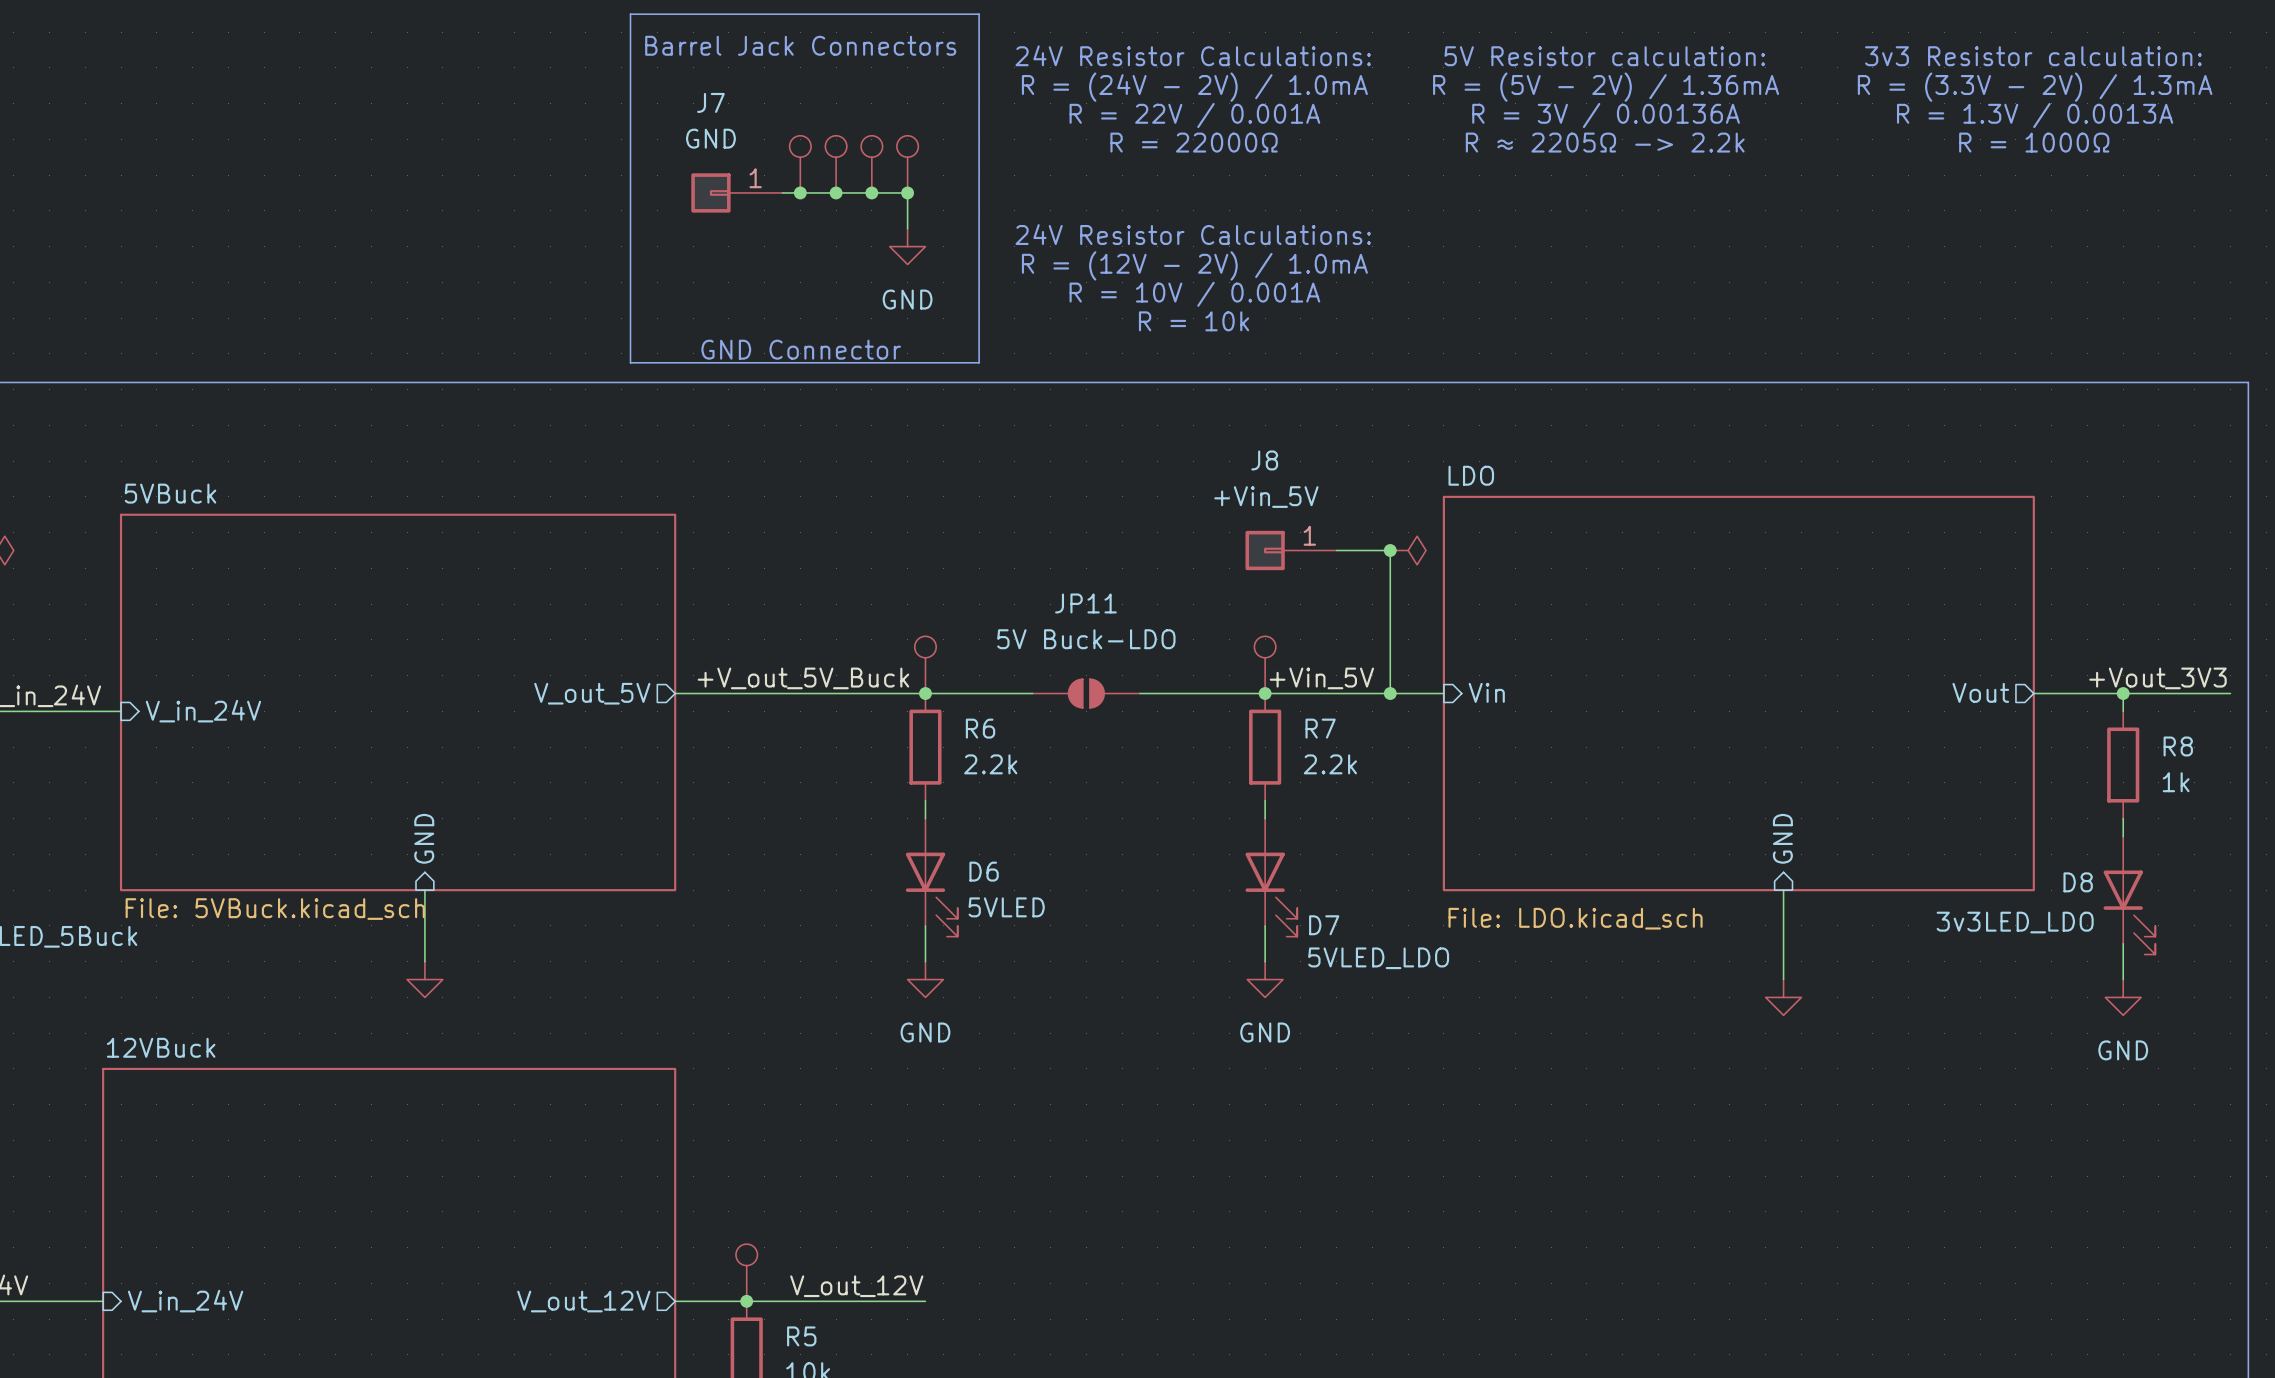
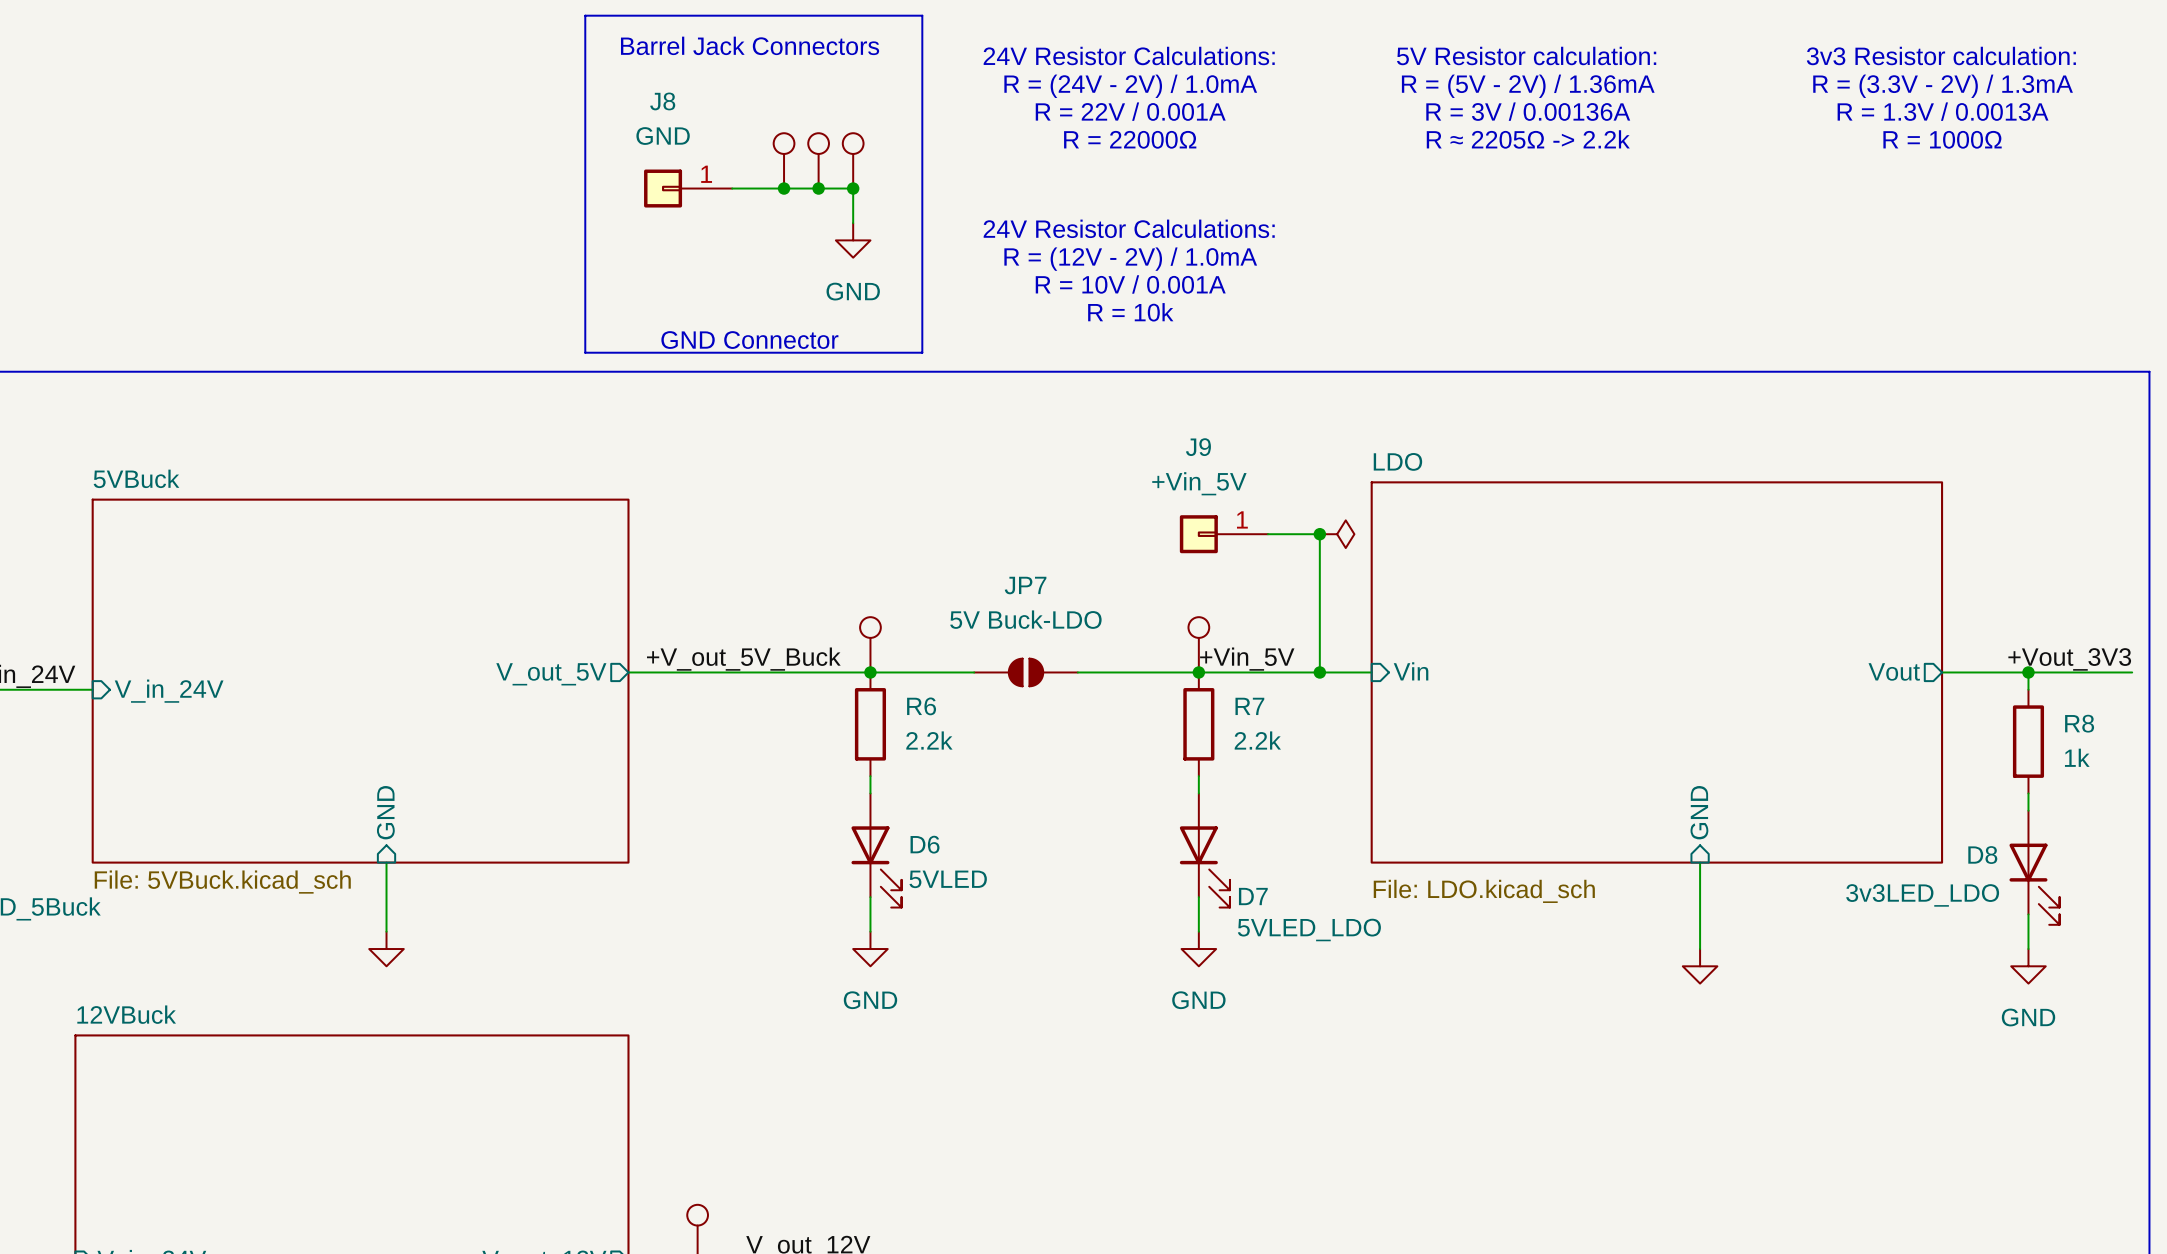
J7 name: J7 (710, 102) -> J8 (662, 101)
part: (800, 164) -> none
junction: (800, 192) -> none
J8 name: J8 (1264, 460) -> J9 (1198, 447)
JP11 name: JP11 (1085, 603) -> JP7 (1025, 585)

